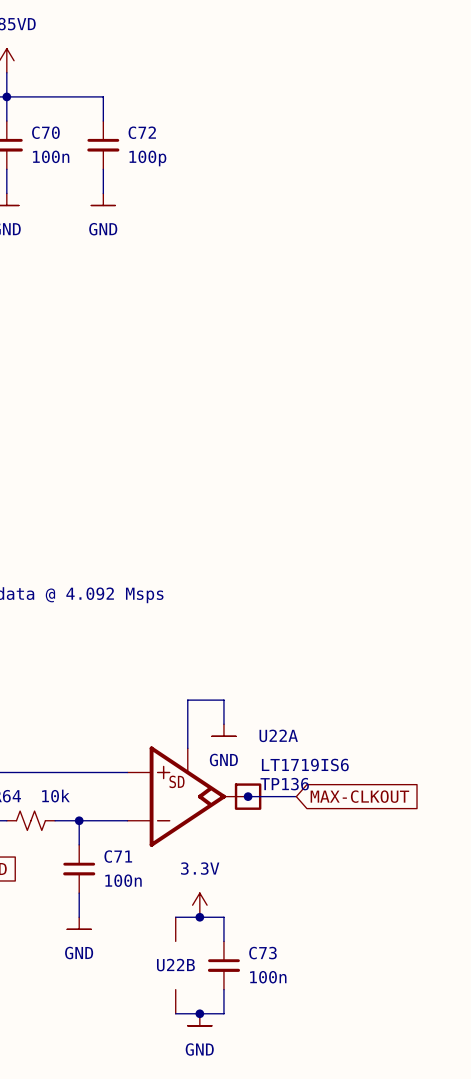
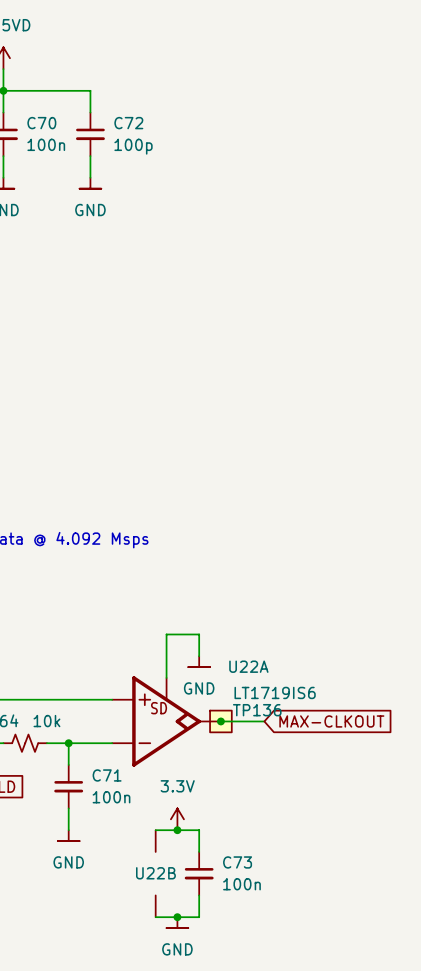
TP136 symbol: [234, 783, 262, 810] -> [210, 710, 232, 733]

